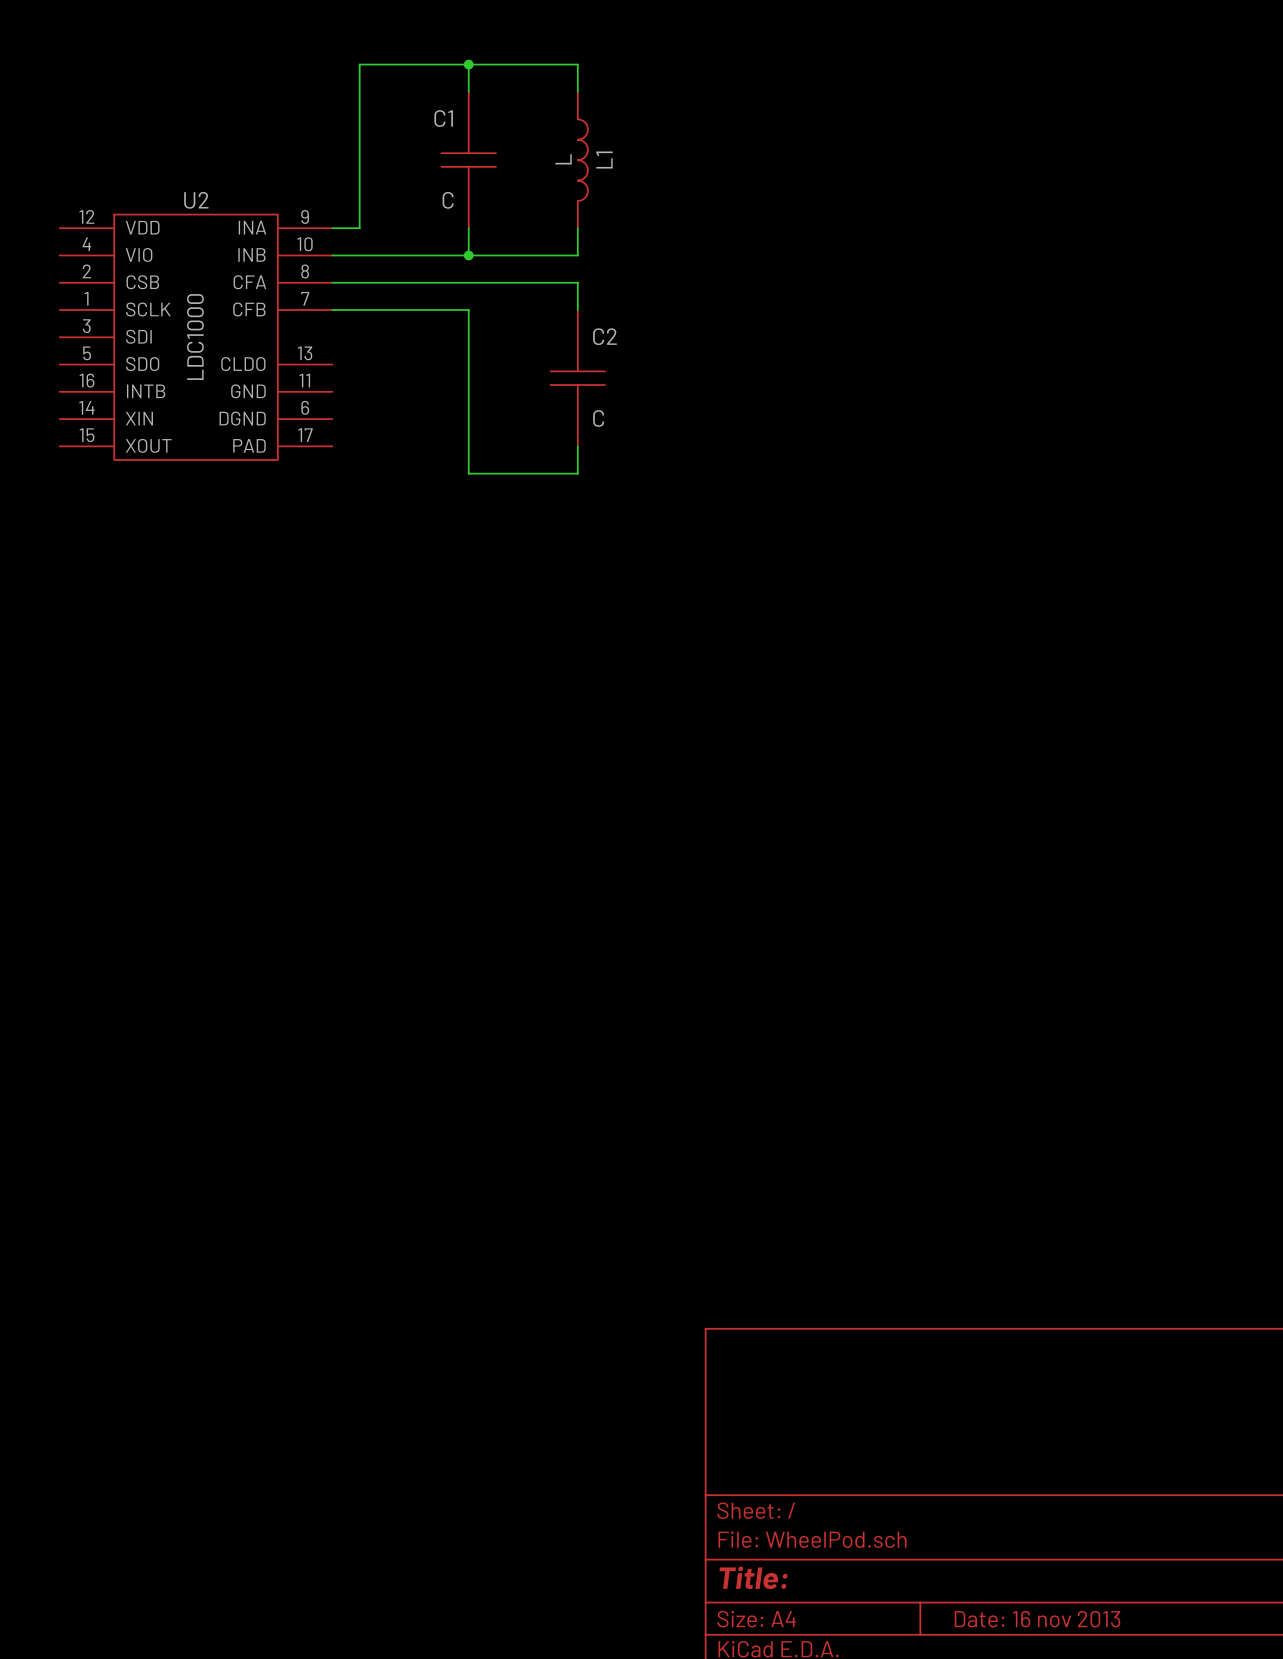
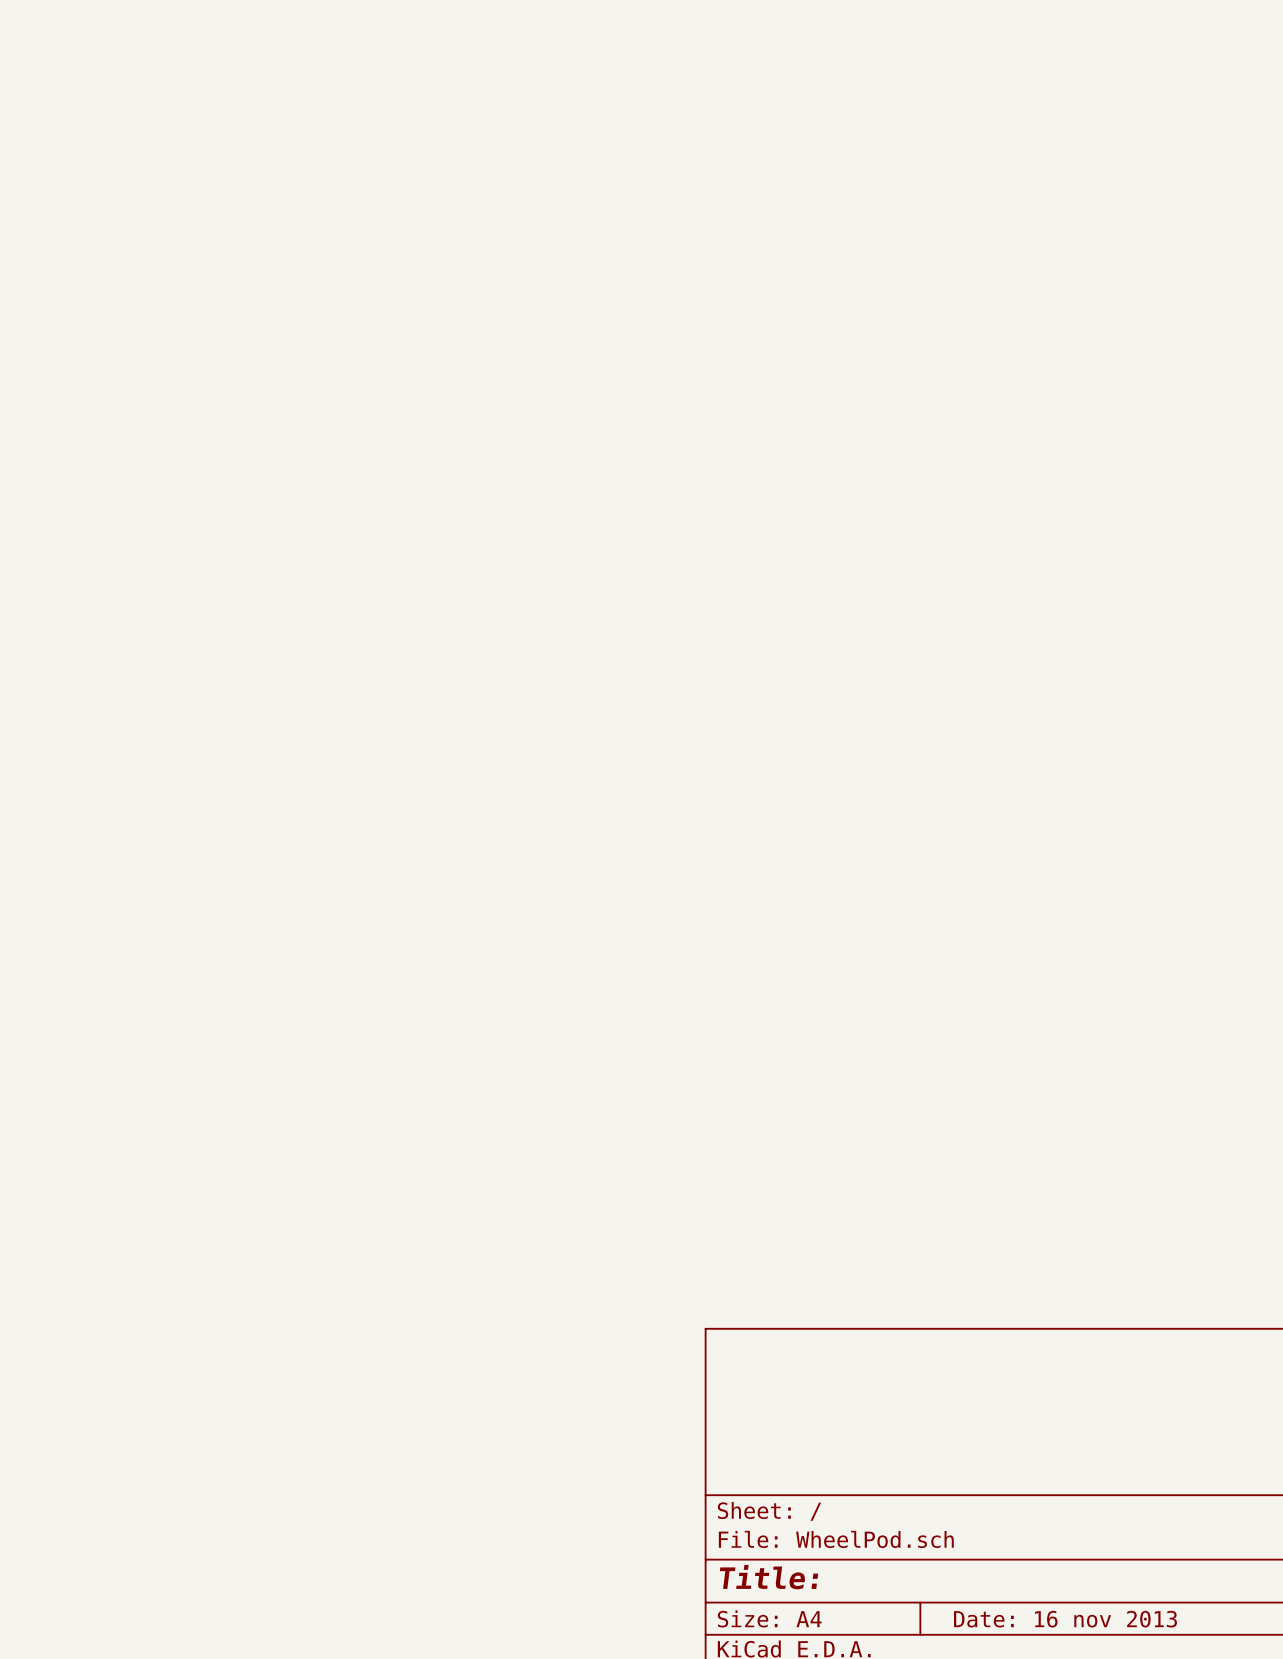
wire: (468, 64) (468, 91) -> none
junction: (468, 64) -> none
wire: (577, 91) (577, 64) (359, 64) (359, 228) (332, 228) -> none
C1: C (468, 160) -> none
L1: L (582, 160) -> none
wire: (468, 228) (468, 255) -> none
wire: (577, 228) (577, 255) (332, 255) -> none
junction: (468, 255) -> none
wire: (332, 282) (577, 282) (577, 310) -> none
wire: (332, 310) (468, 310) (468, 473) (577, 473) (577, 446) -> none
U2: LDC1000 (196, 337) -> none
C2: C (577, 378) -> none

